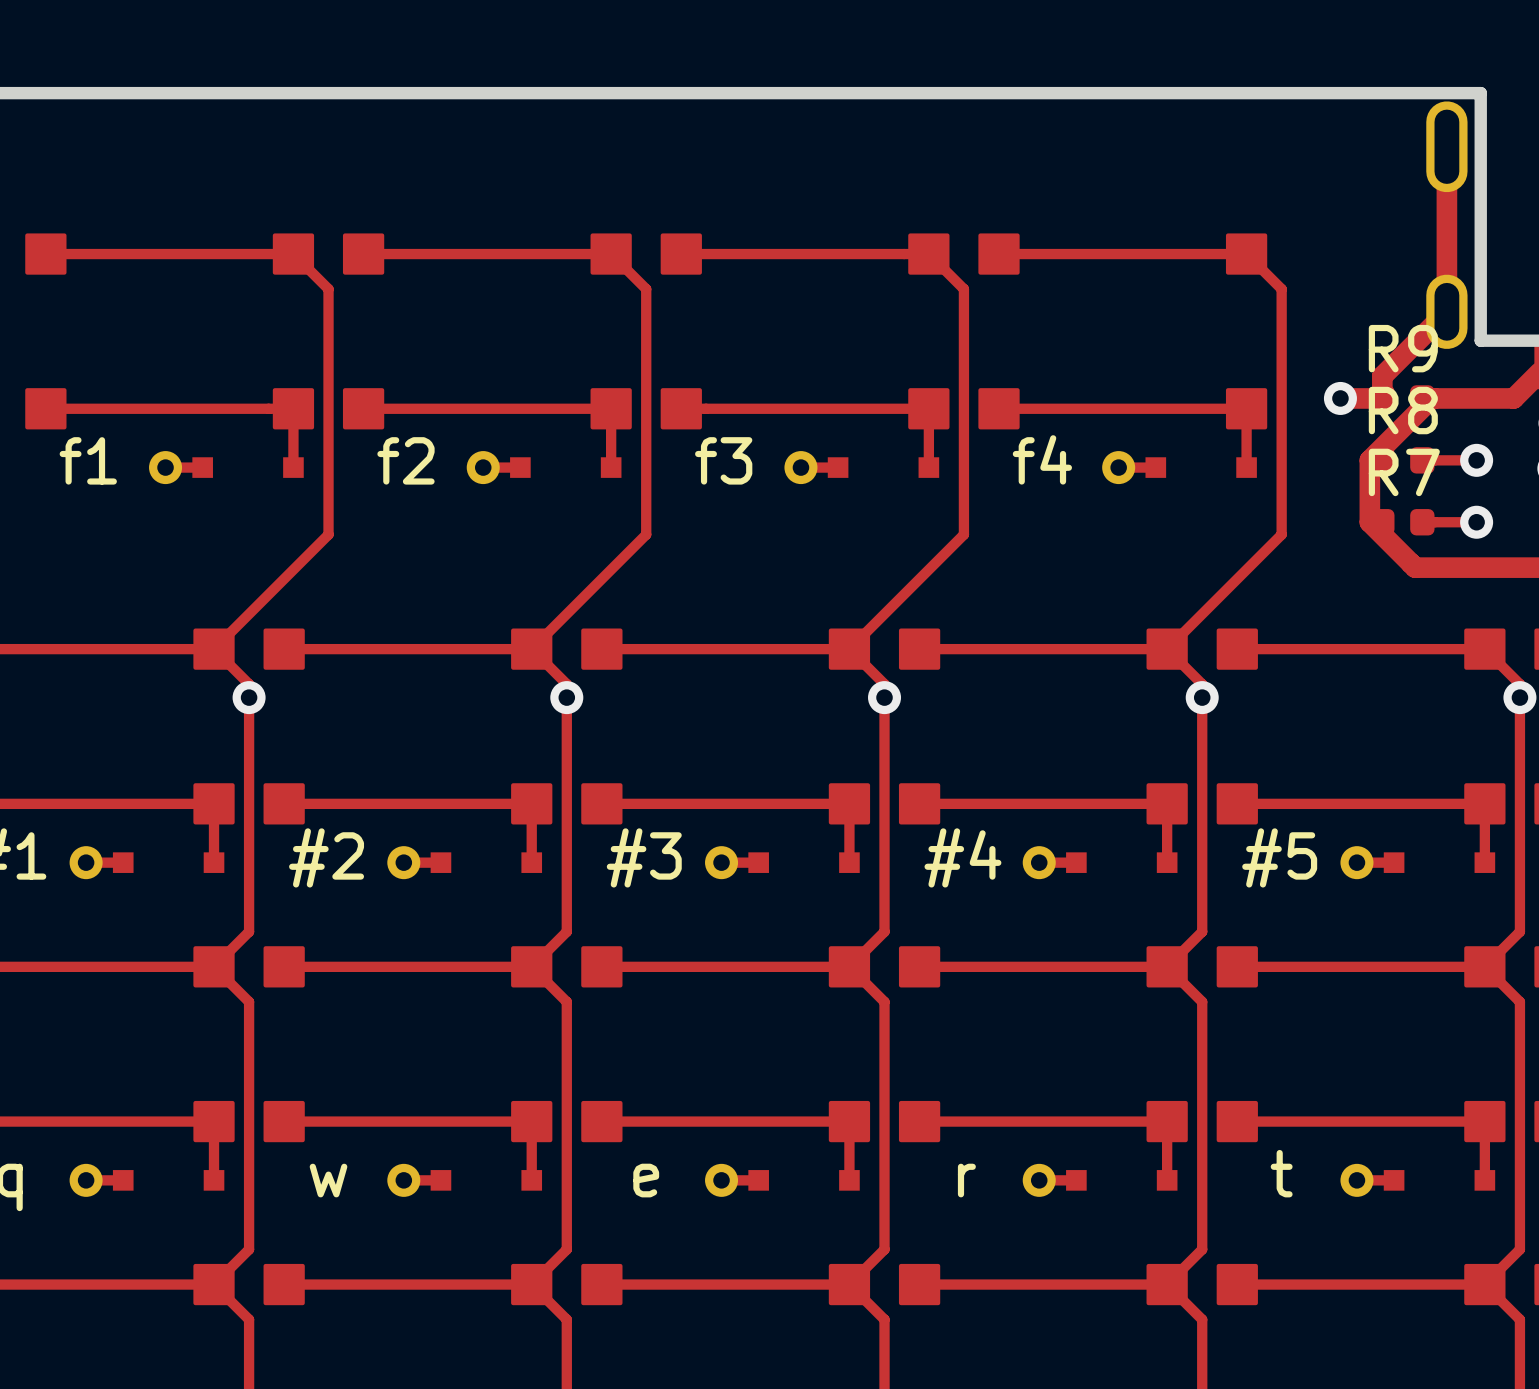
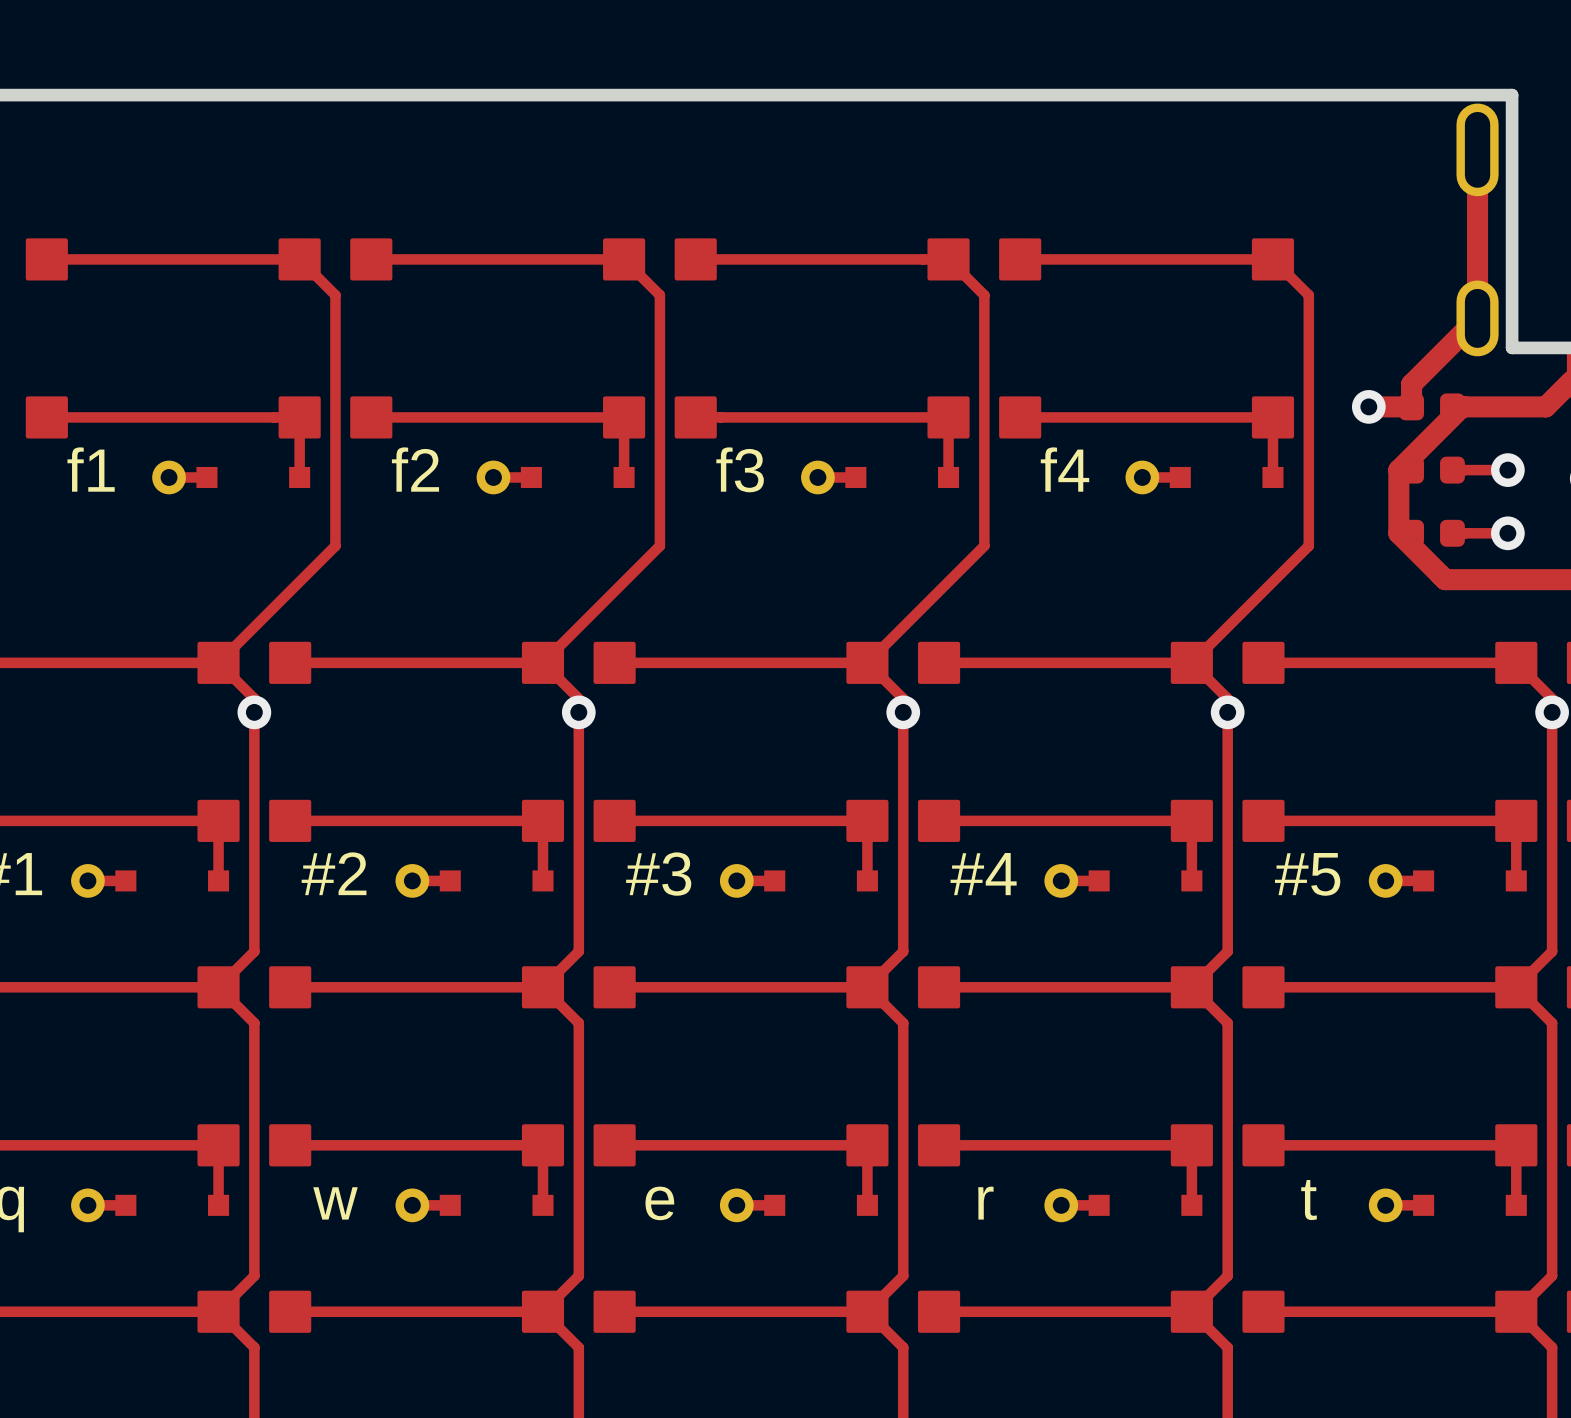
R9 name: R9 (1403, 348) -> none
R8 name: R8 (1403, 410) -> none
R7 name: R7 (1404, 472) -> none

